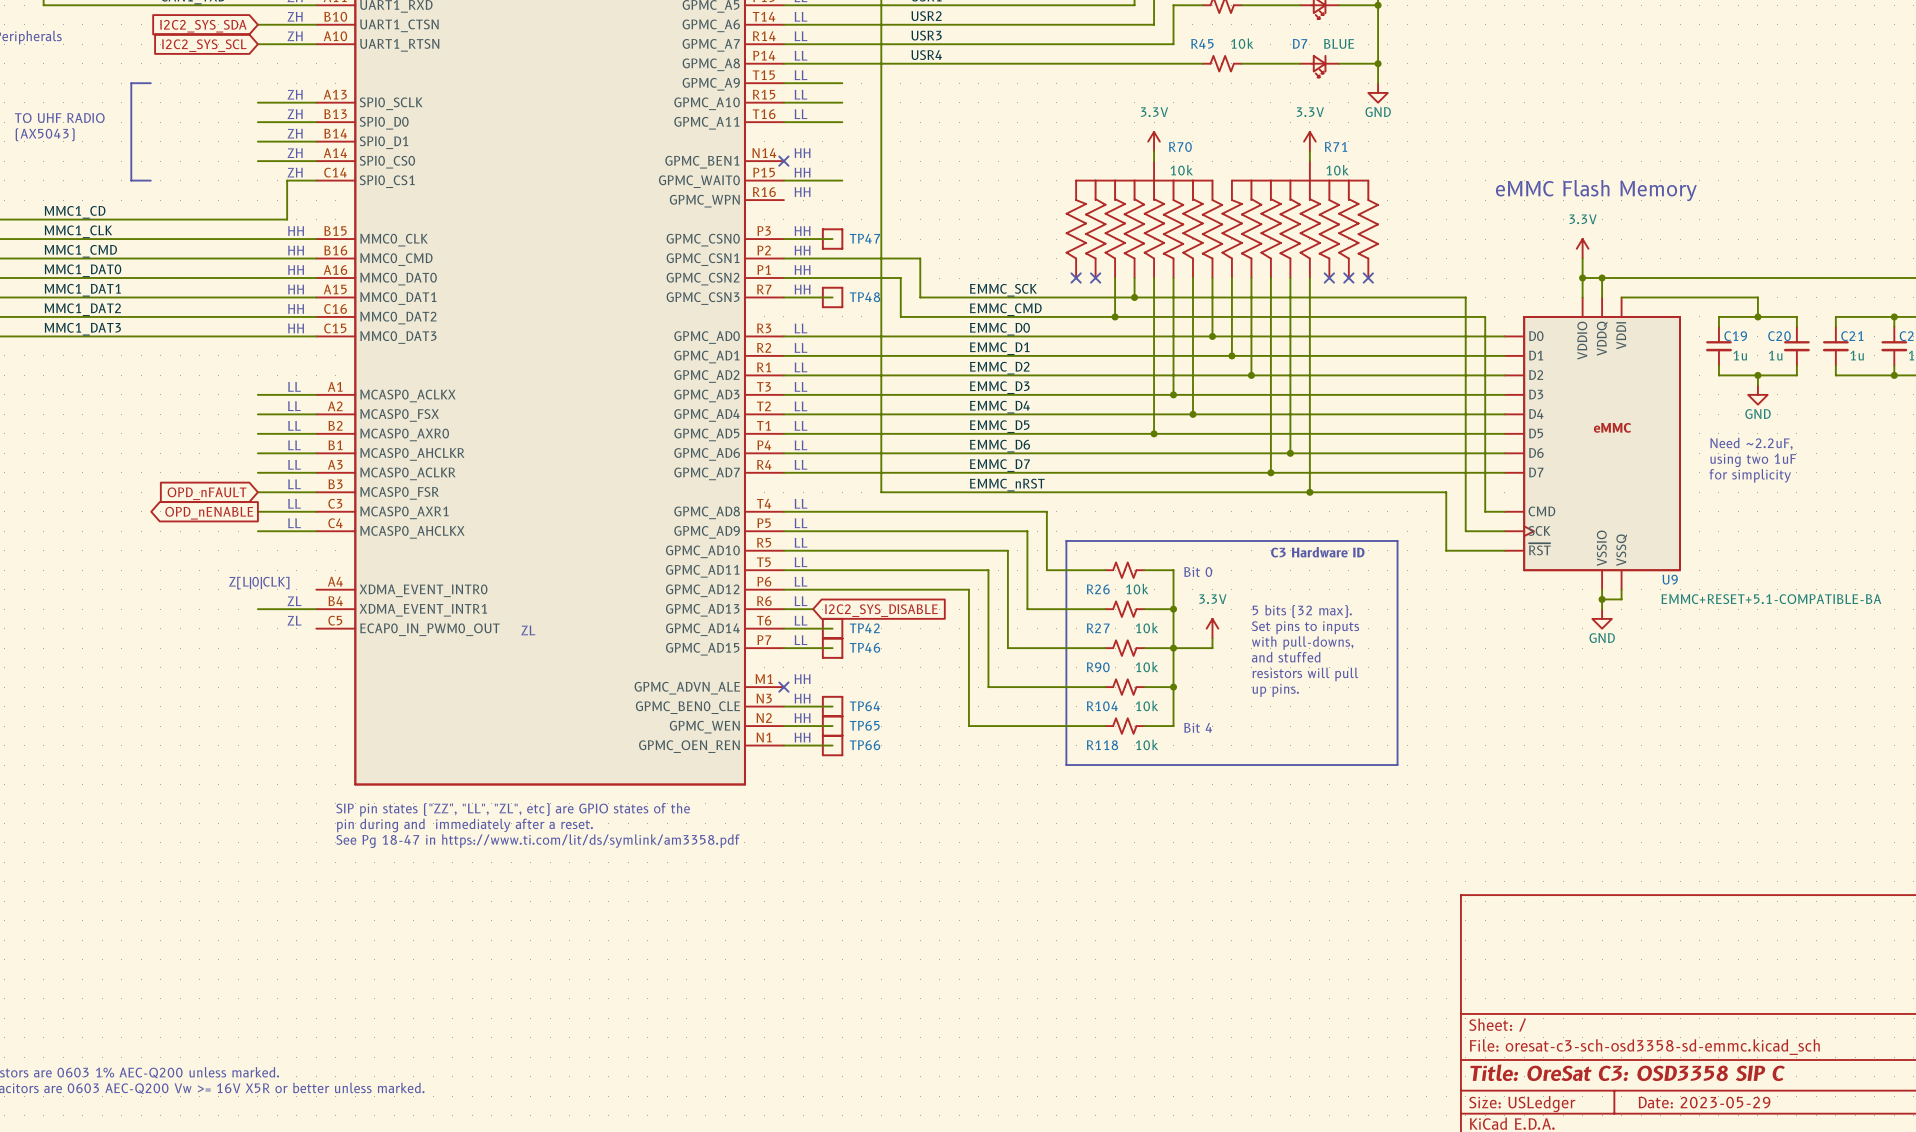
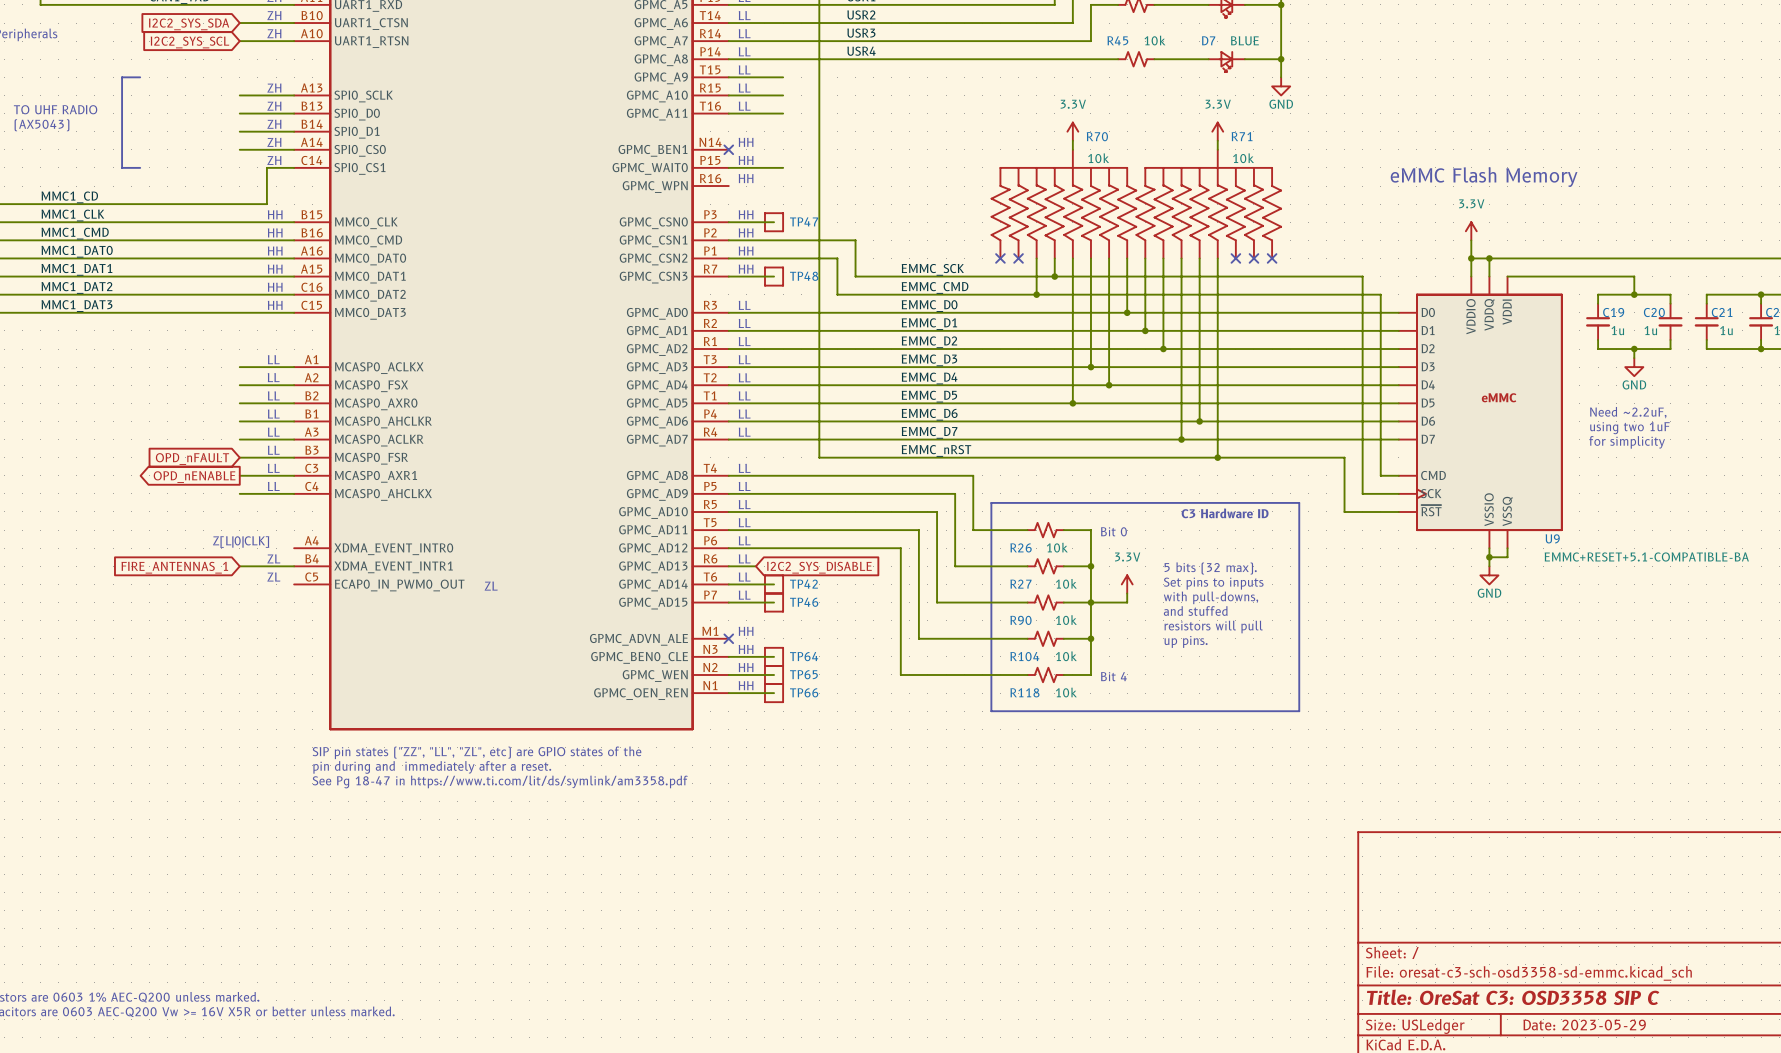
global label: none -> FIRE_ANTENNAS_1 (174, 567)

